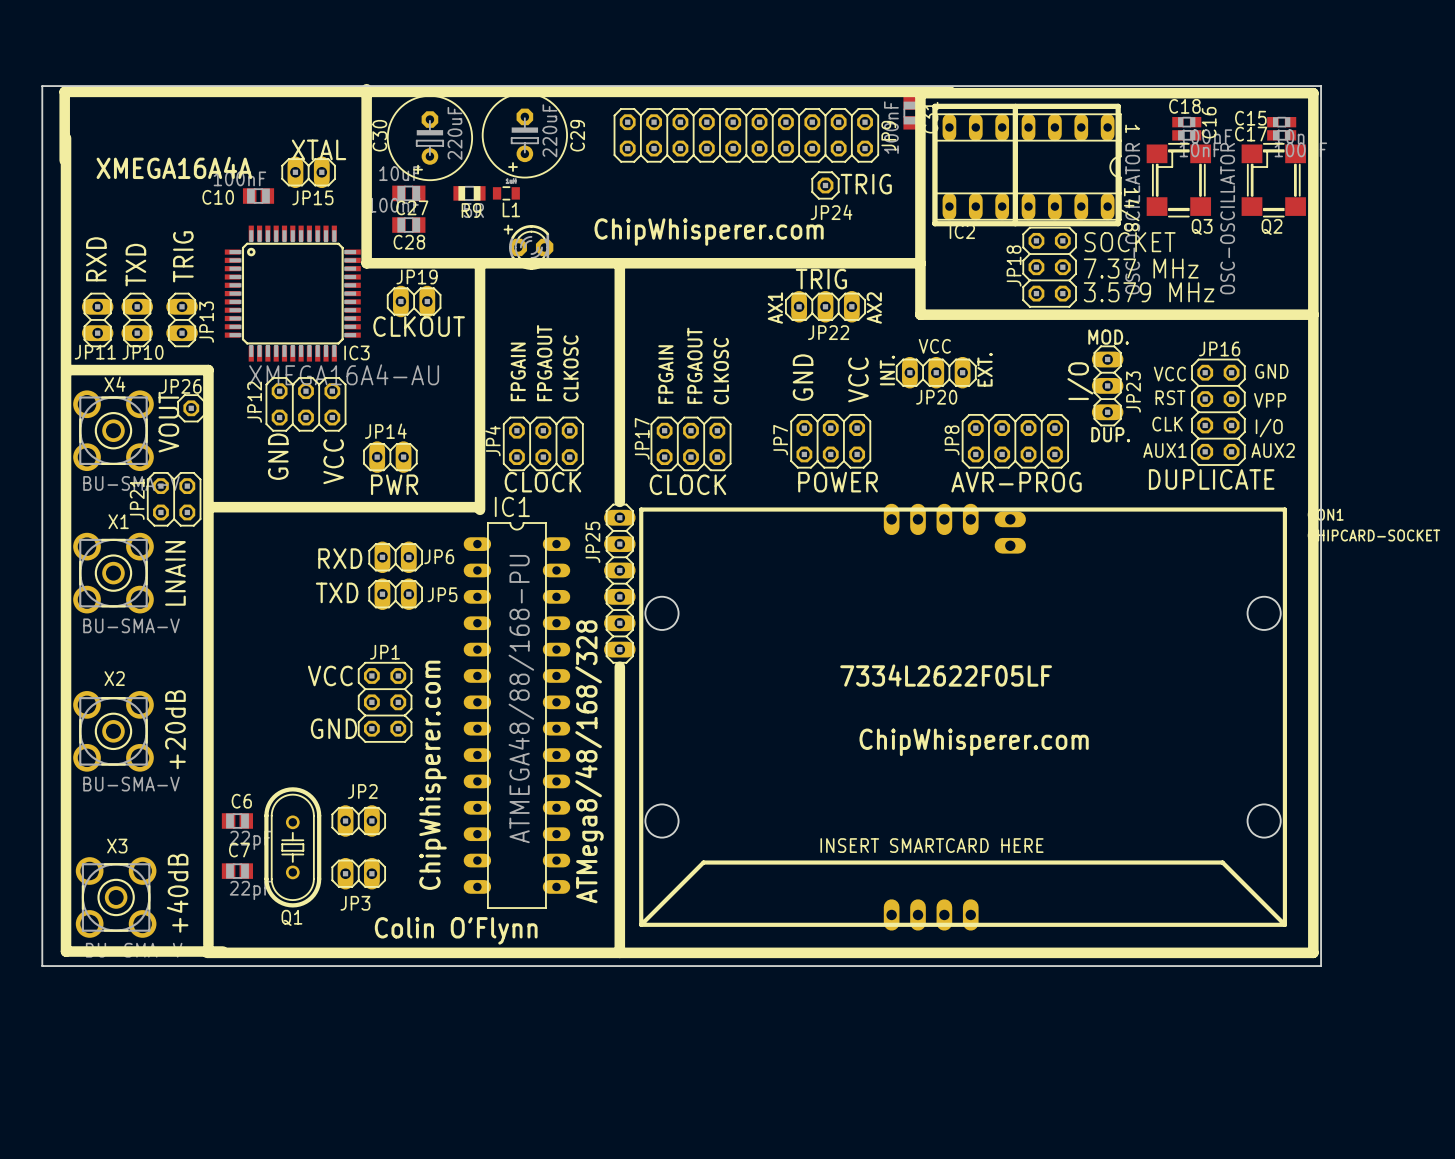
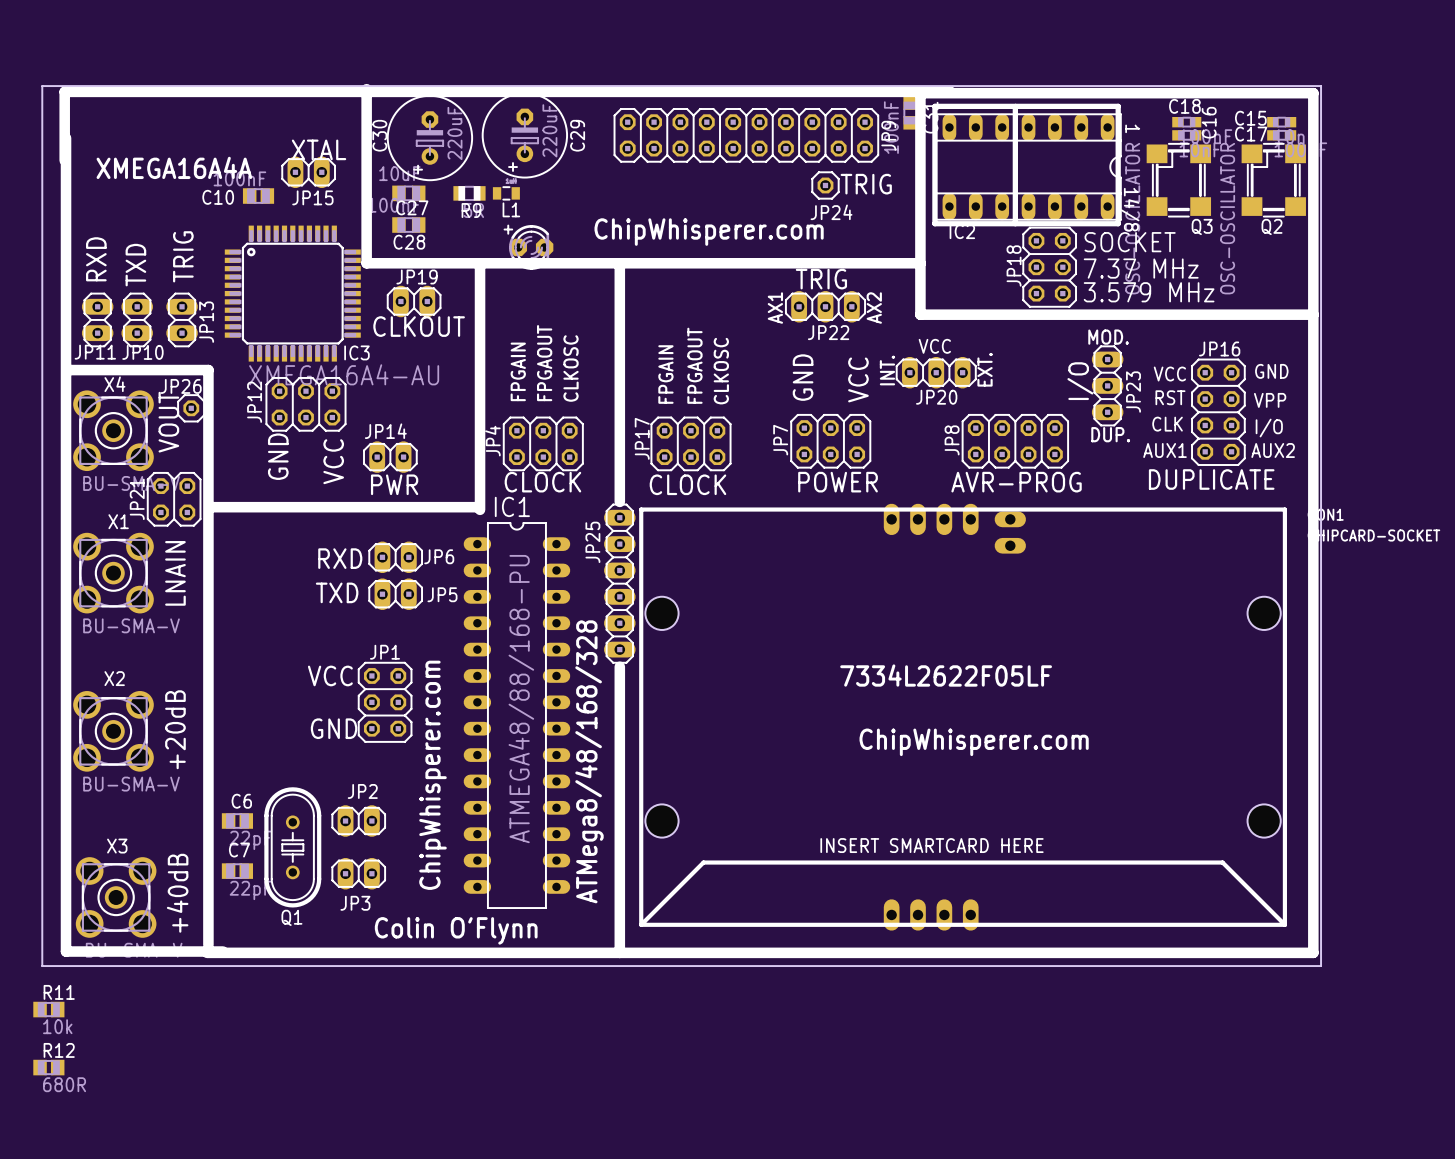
R11: none -> 10k (48, 1009)
R12: none -> 680R (48, 1067)

